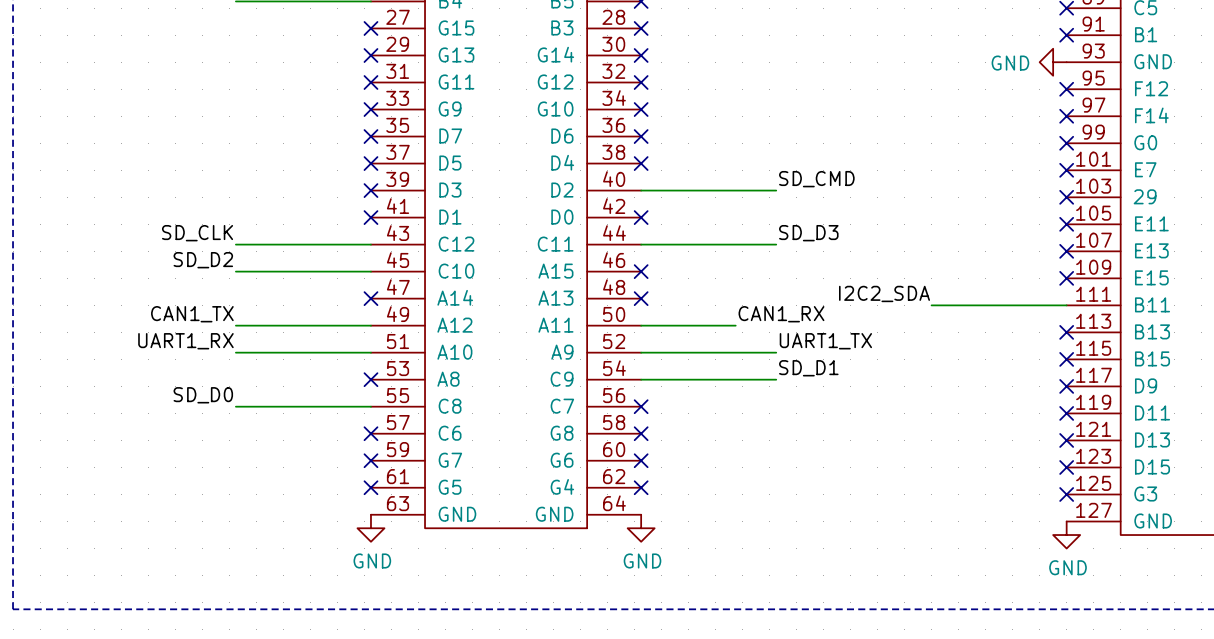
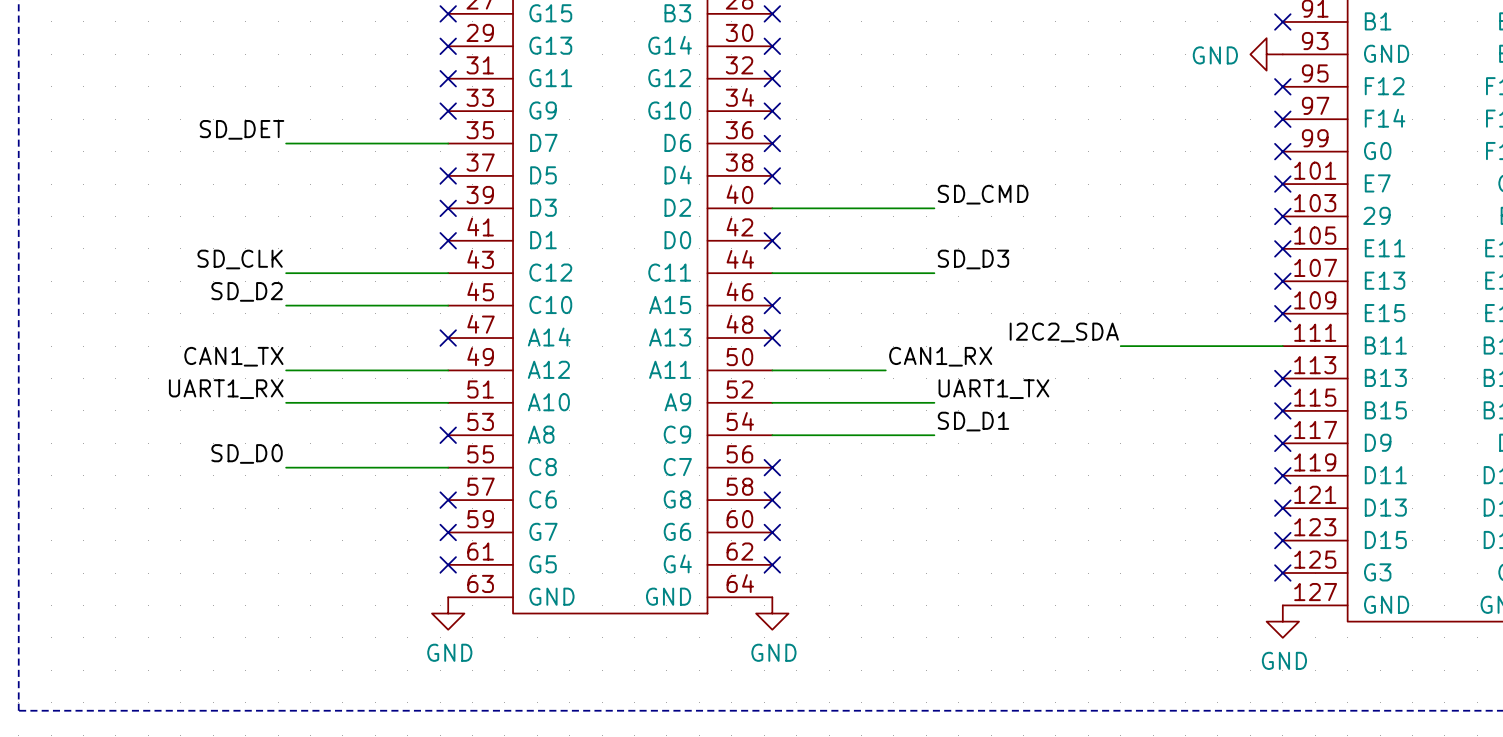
label: none -> SD_DET (242, 129)
wire: none -> (286, 143) (448, 143)
no-connect mark: (370, 136) -> none

